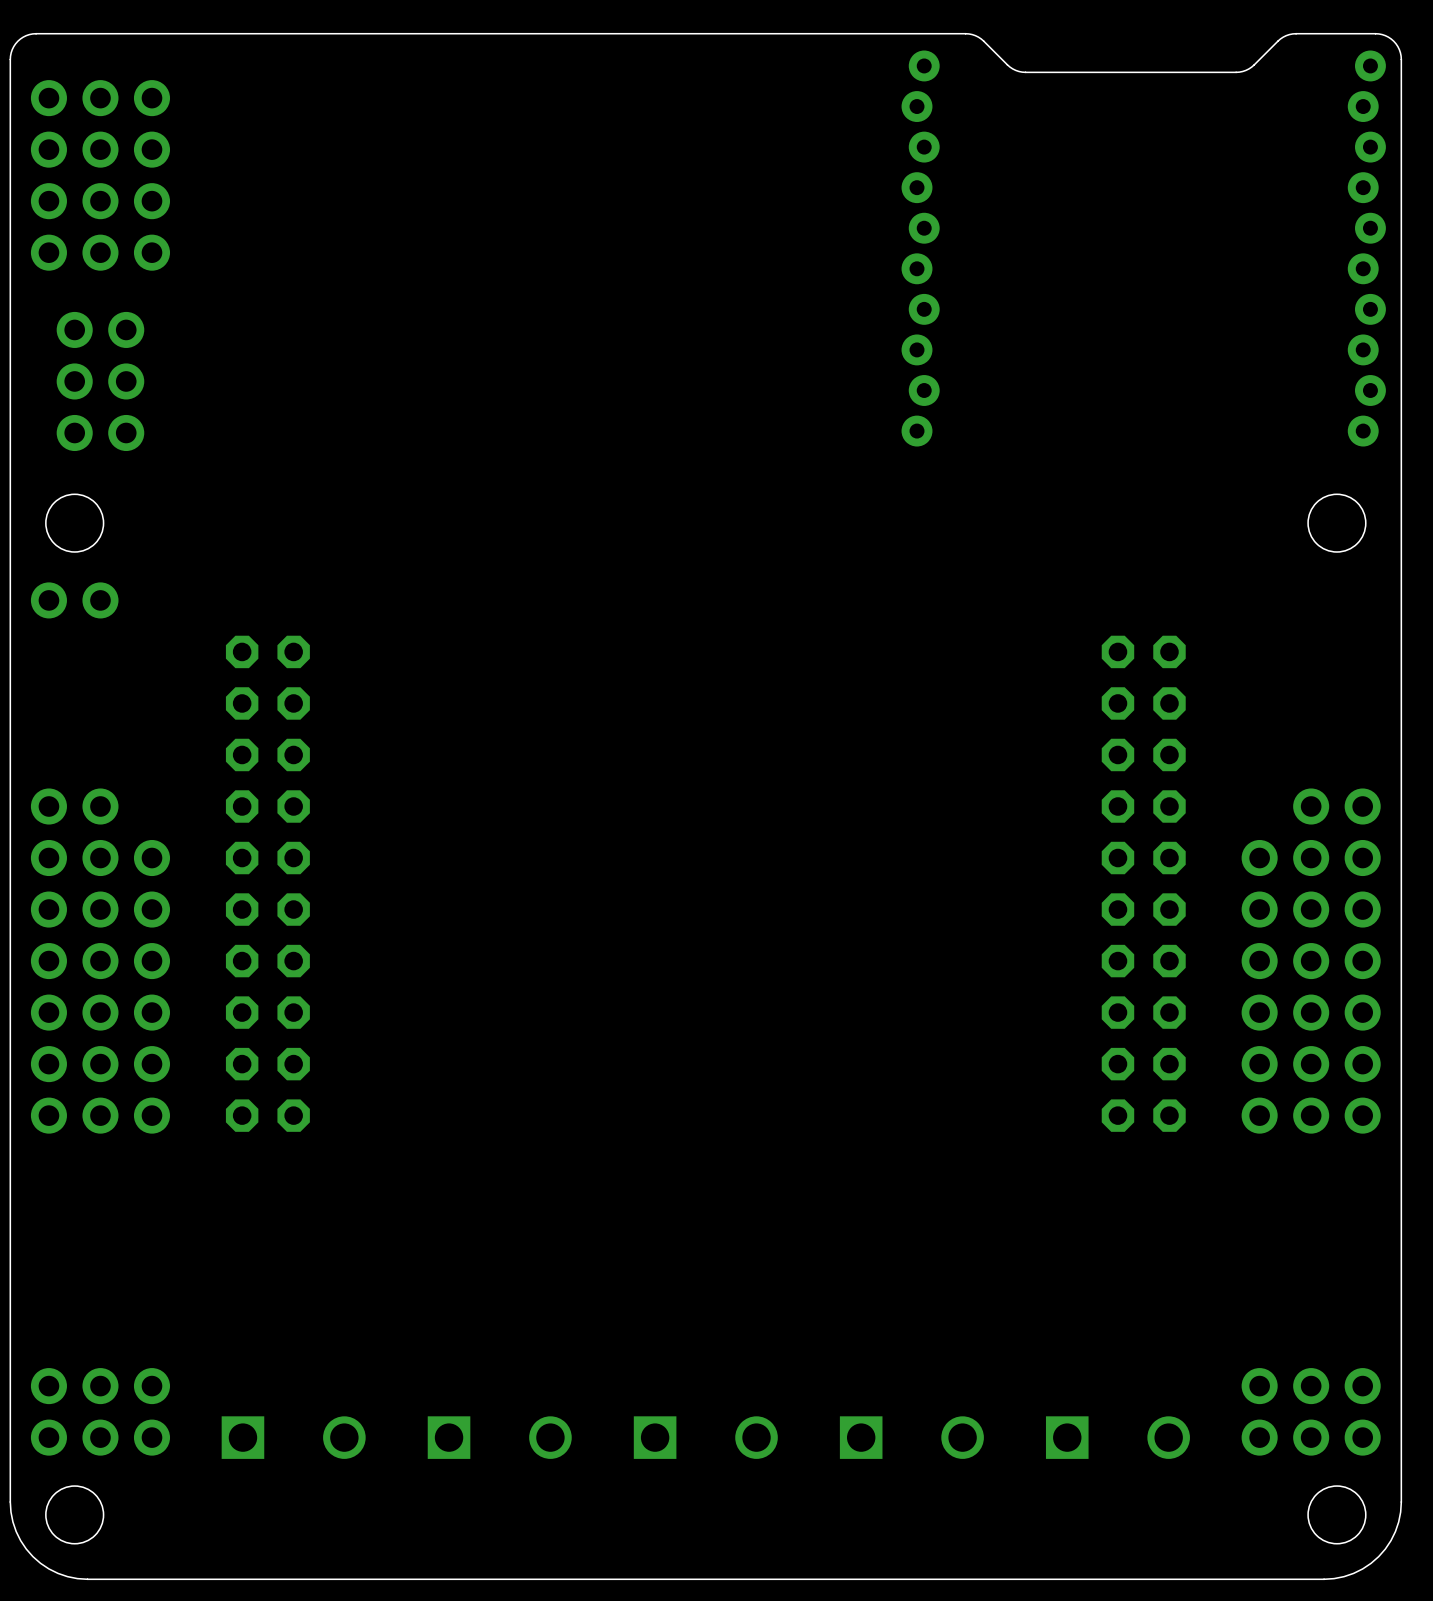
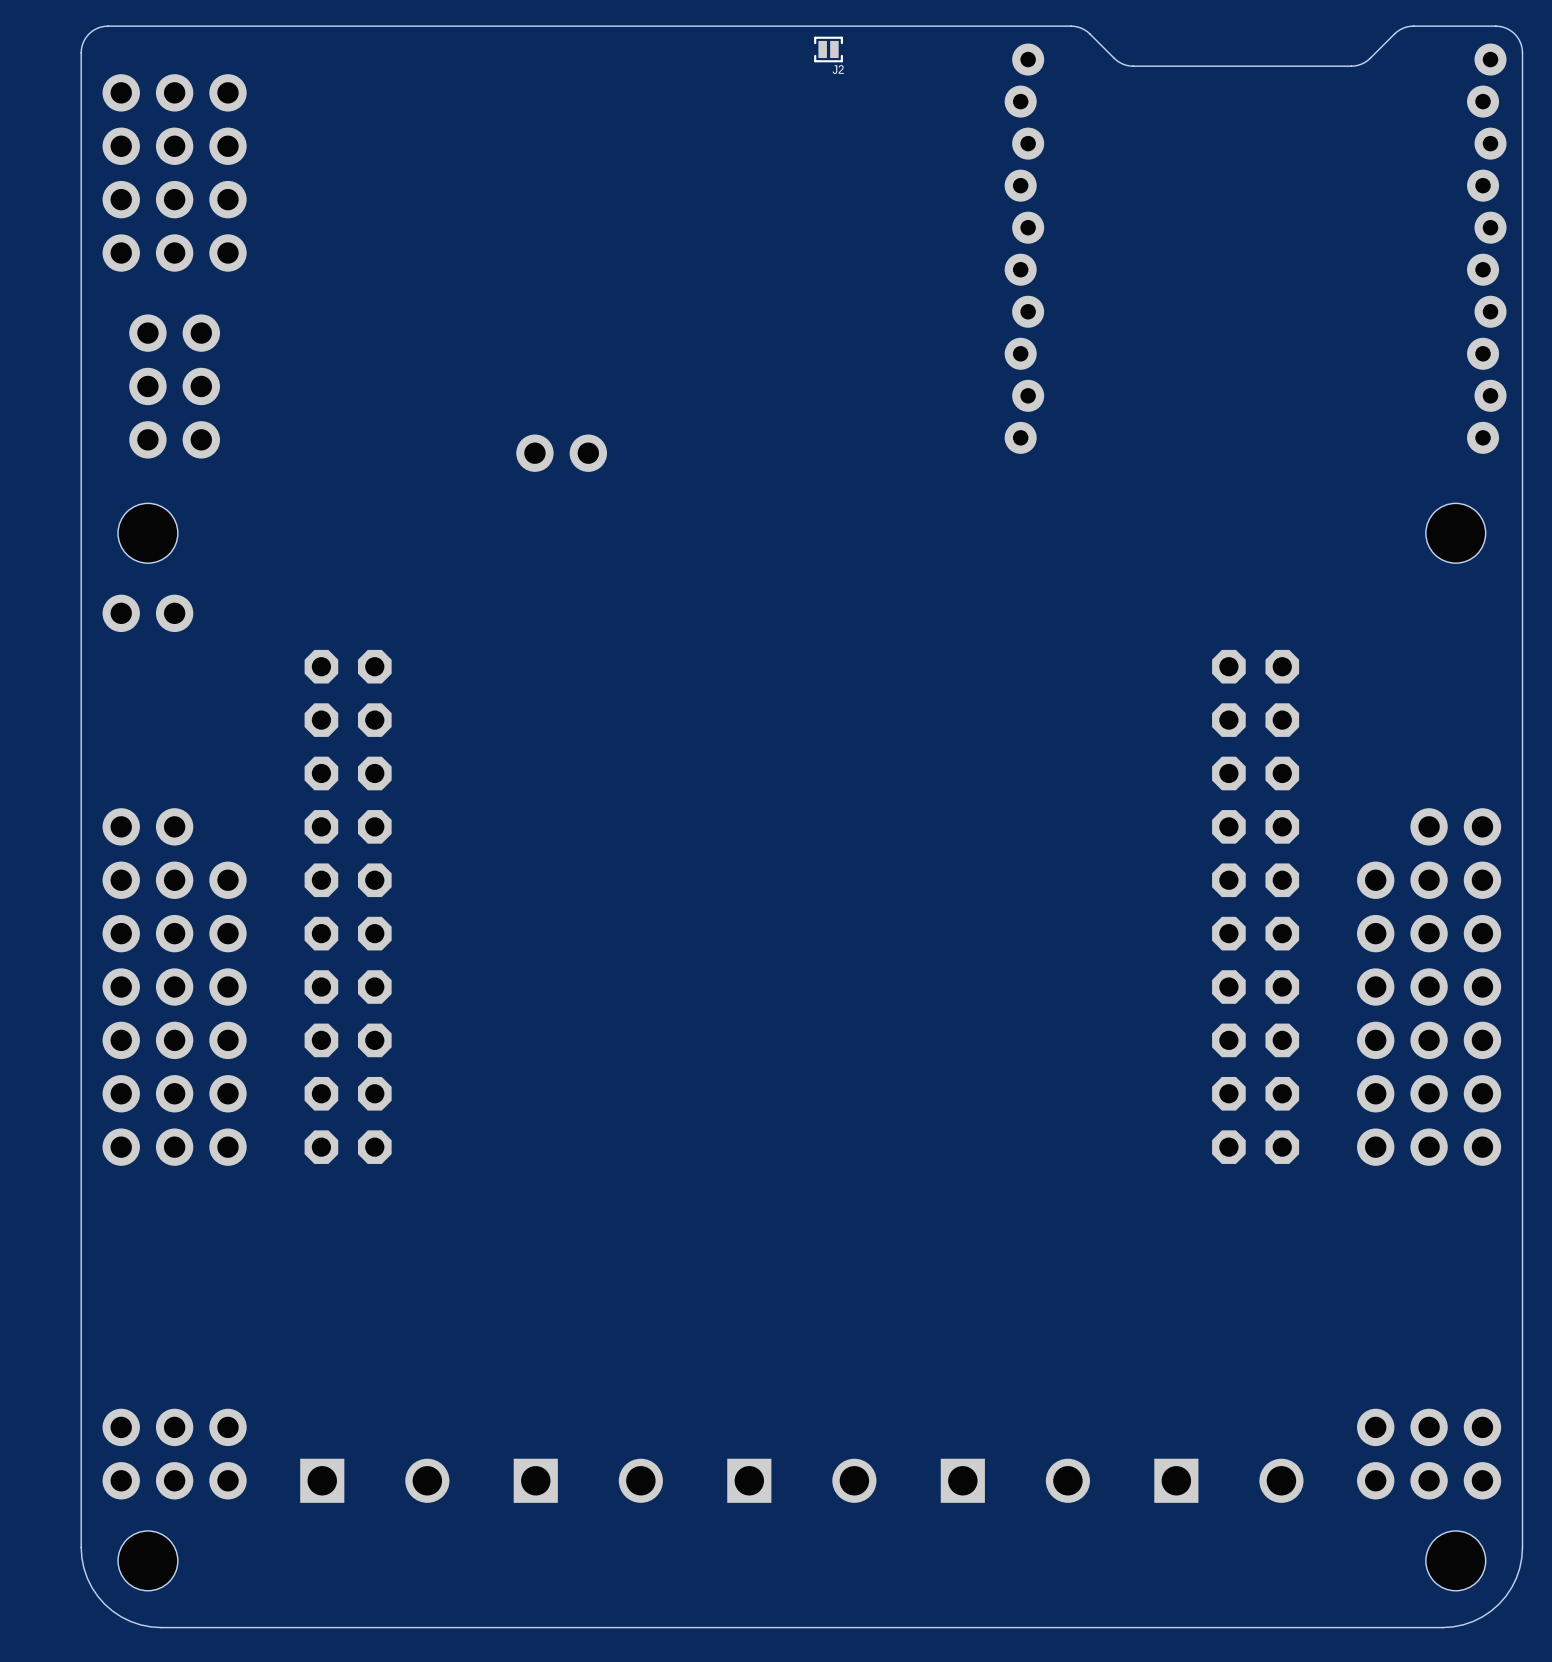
J2: none -> (828, 49)
part: none -> (561, 453)

